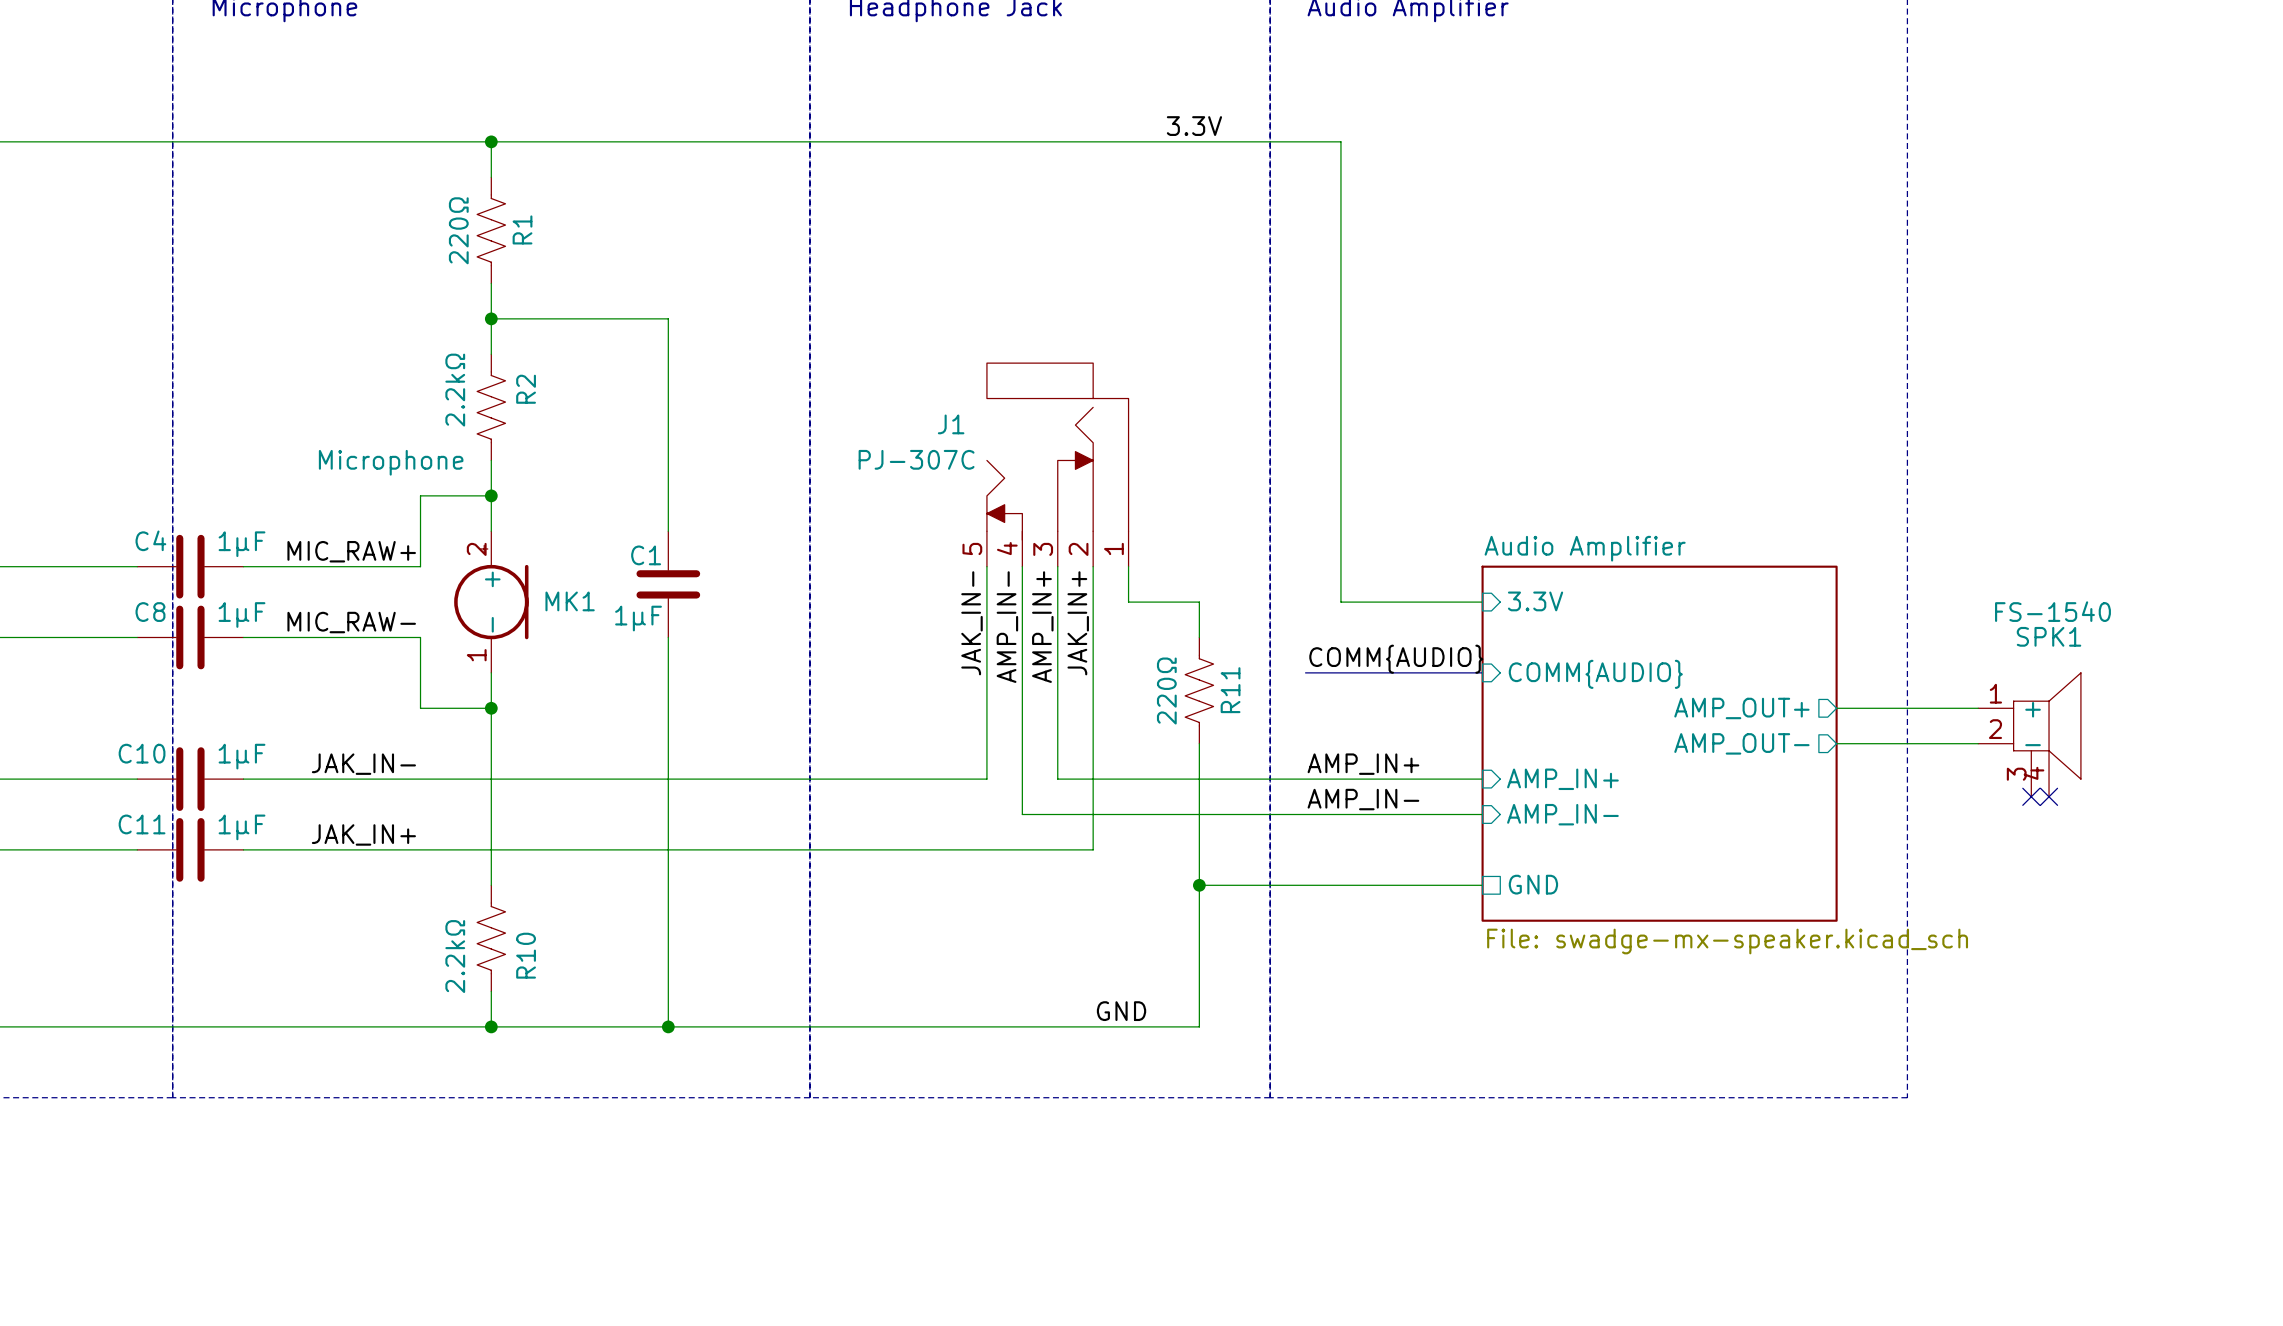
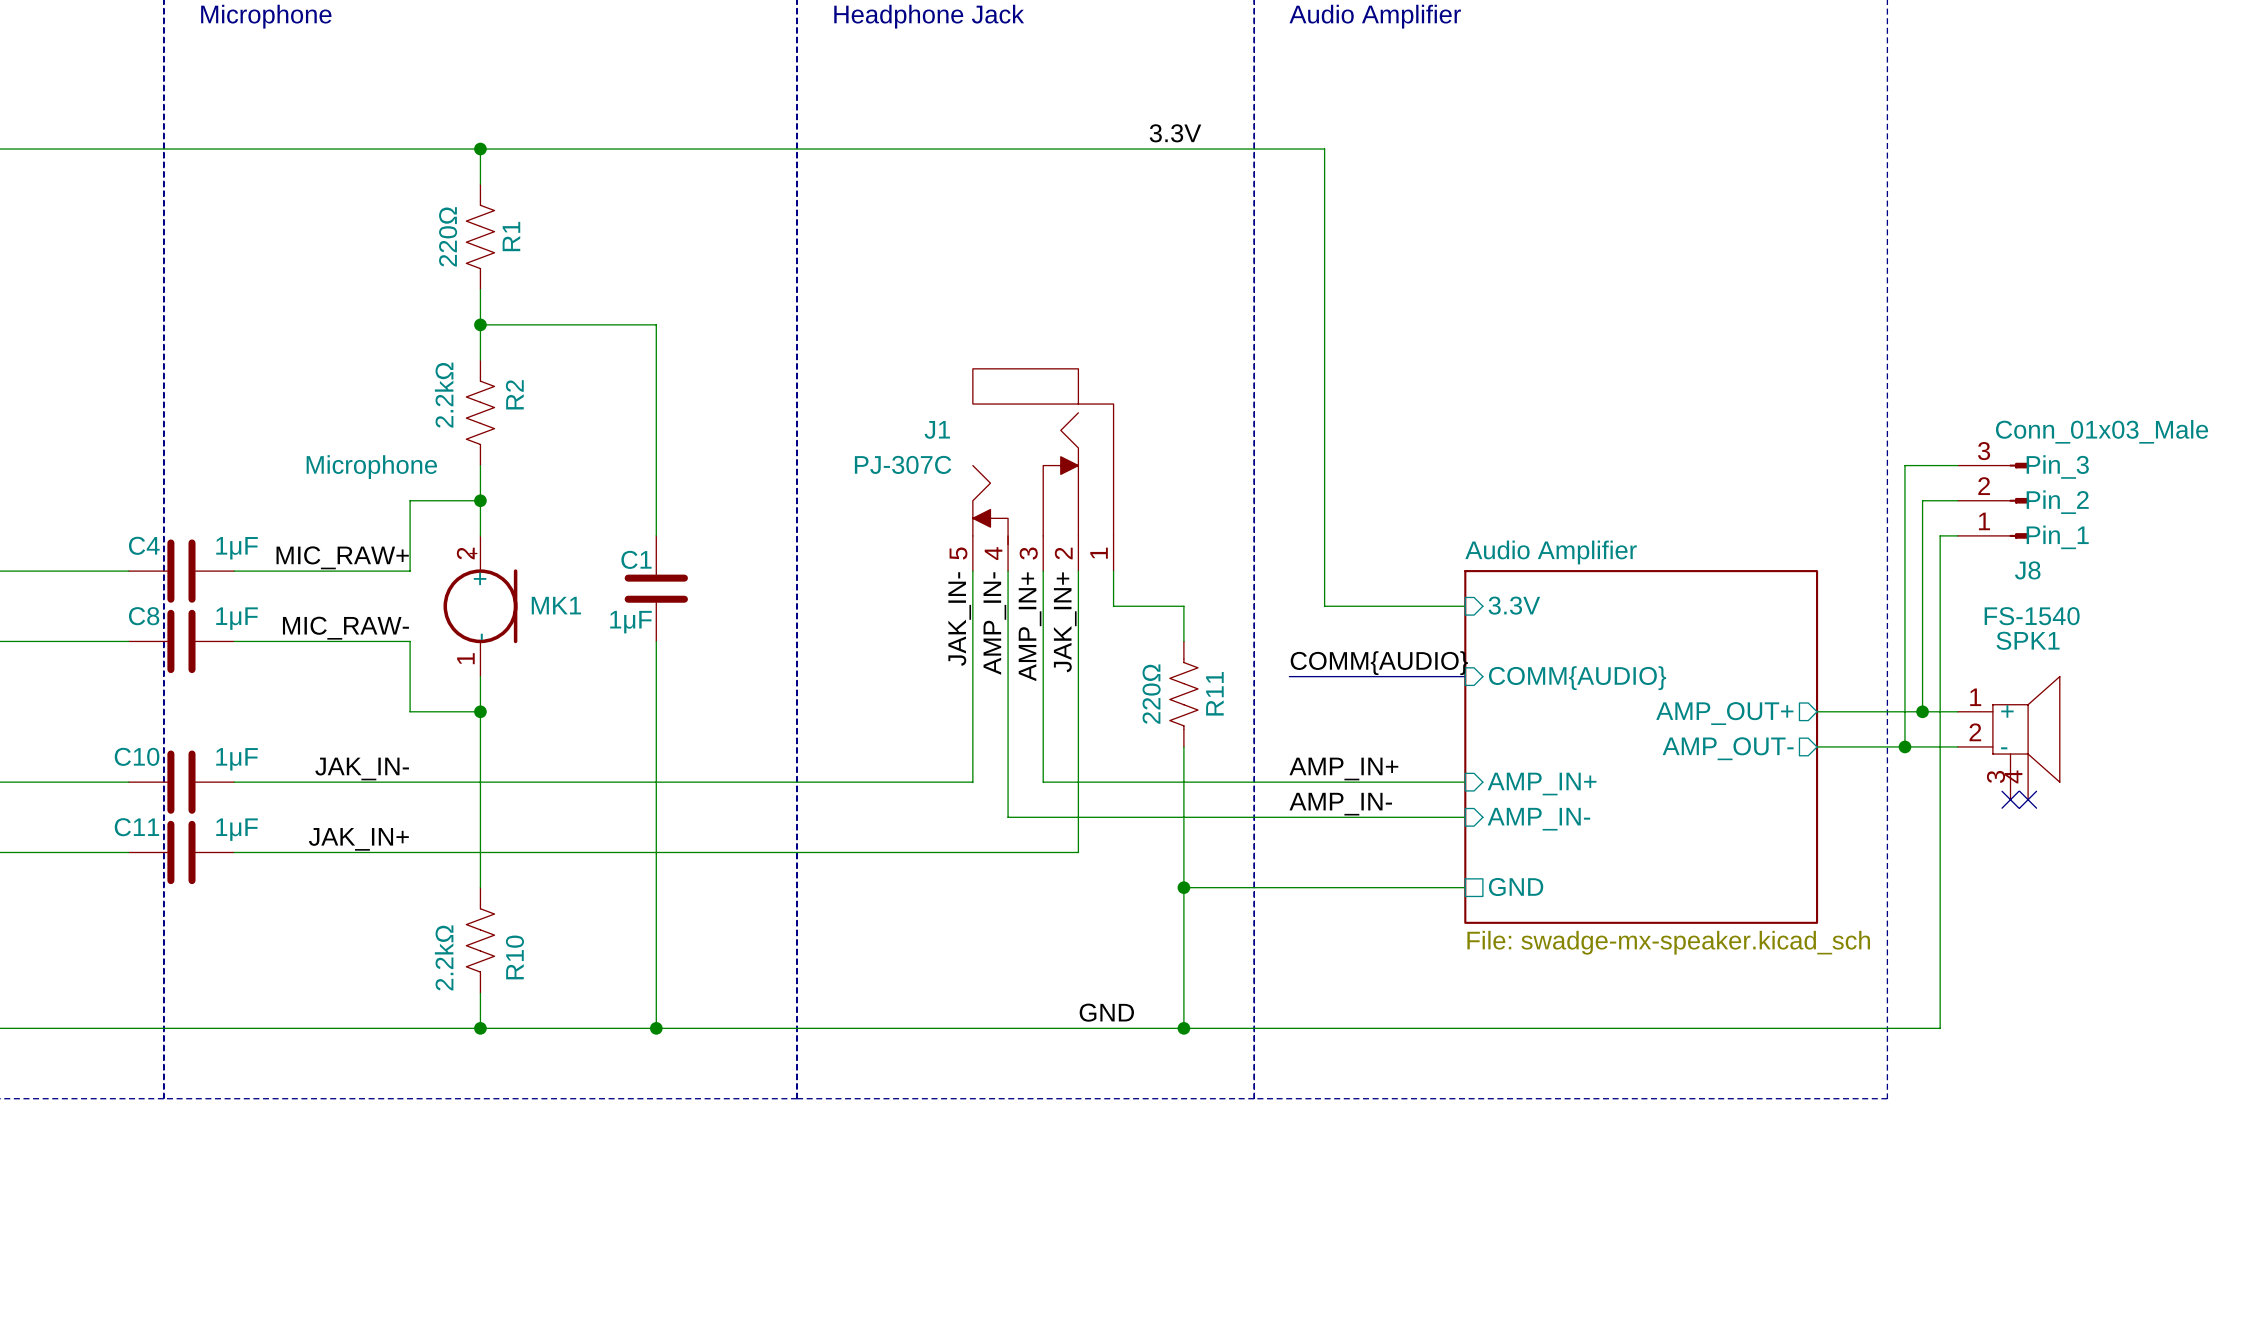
wire: none -> (1957, 465) (1904, 465) (1904, 746)
wire: none -> (1957, 500) (1922, 500) (1922, 711)
J8: none -> Conn_01x03_Male (1993, 500)
wire: none -> (1957, 535) (1940, 535) (1940, 1028) (1183, 1028)
junction: none -> (1922, 711)
junction: none -> (1904, 746)
junction: none -> (1183, 1028)

